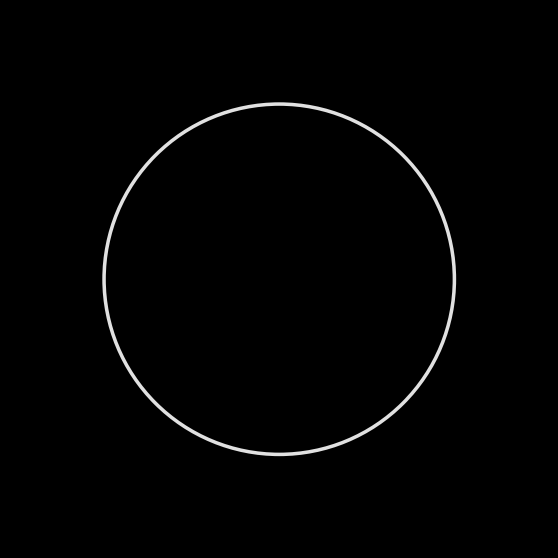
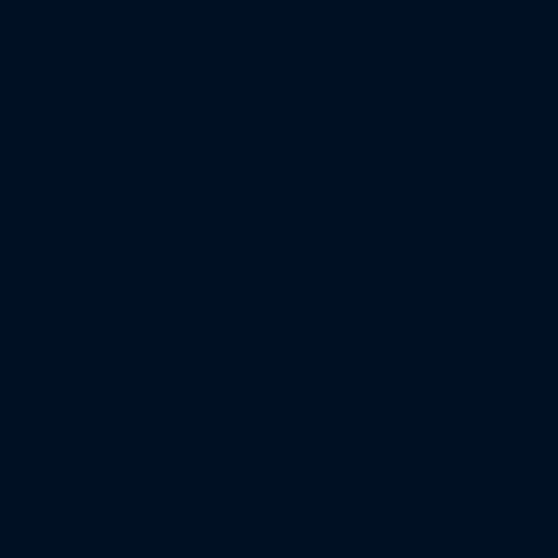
drawing: [102, 102, 457, 457] -> none

